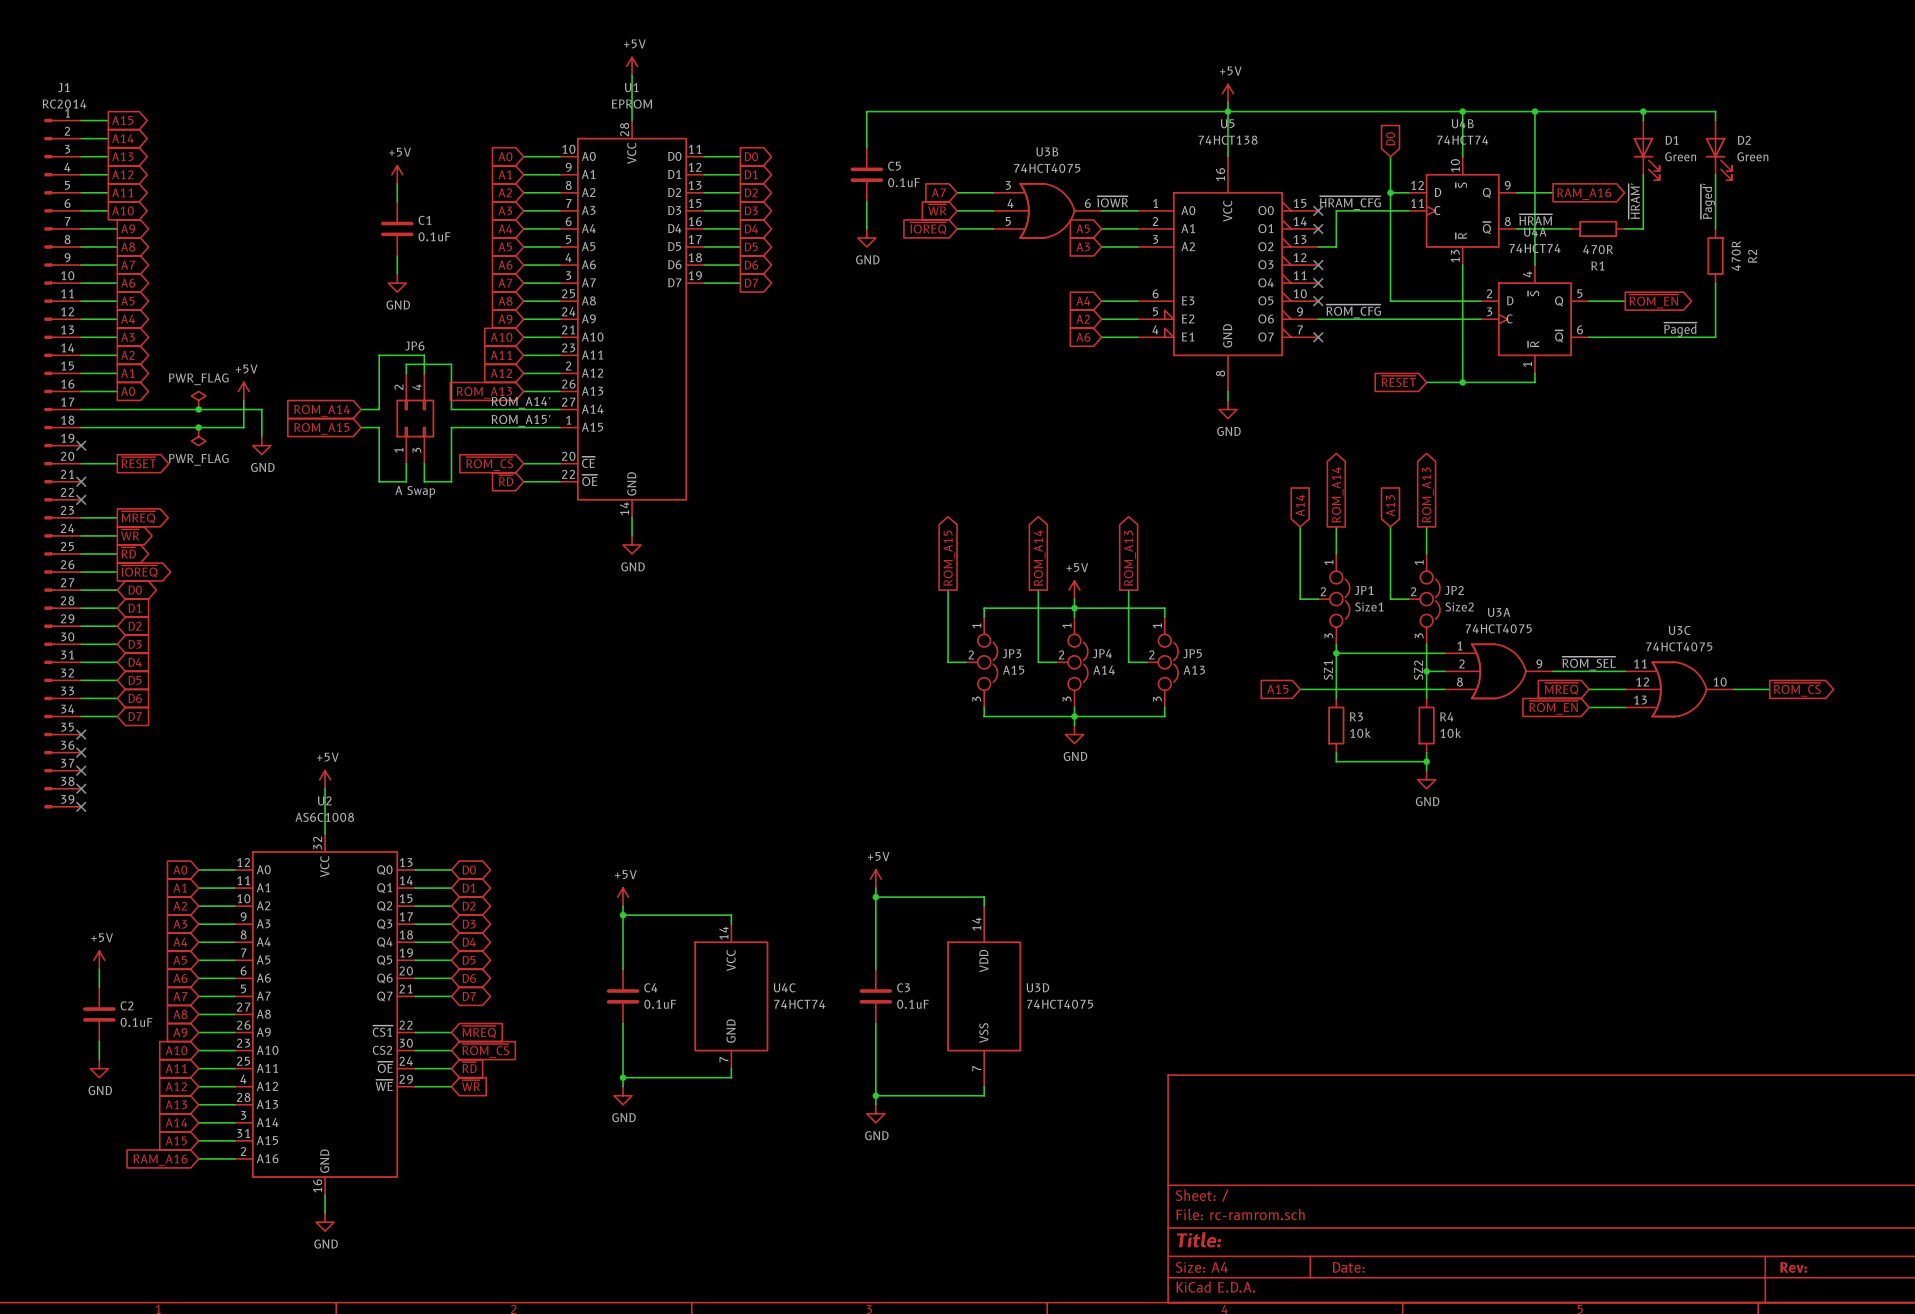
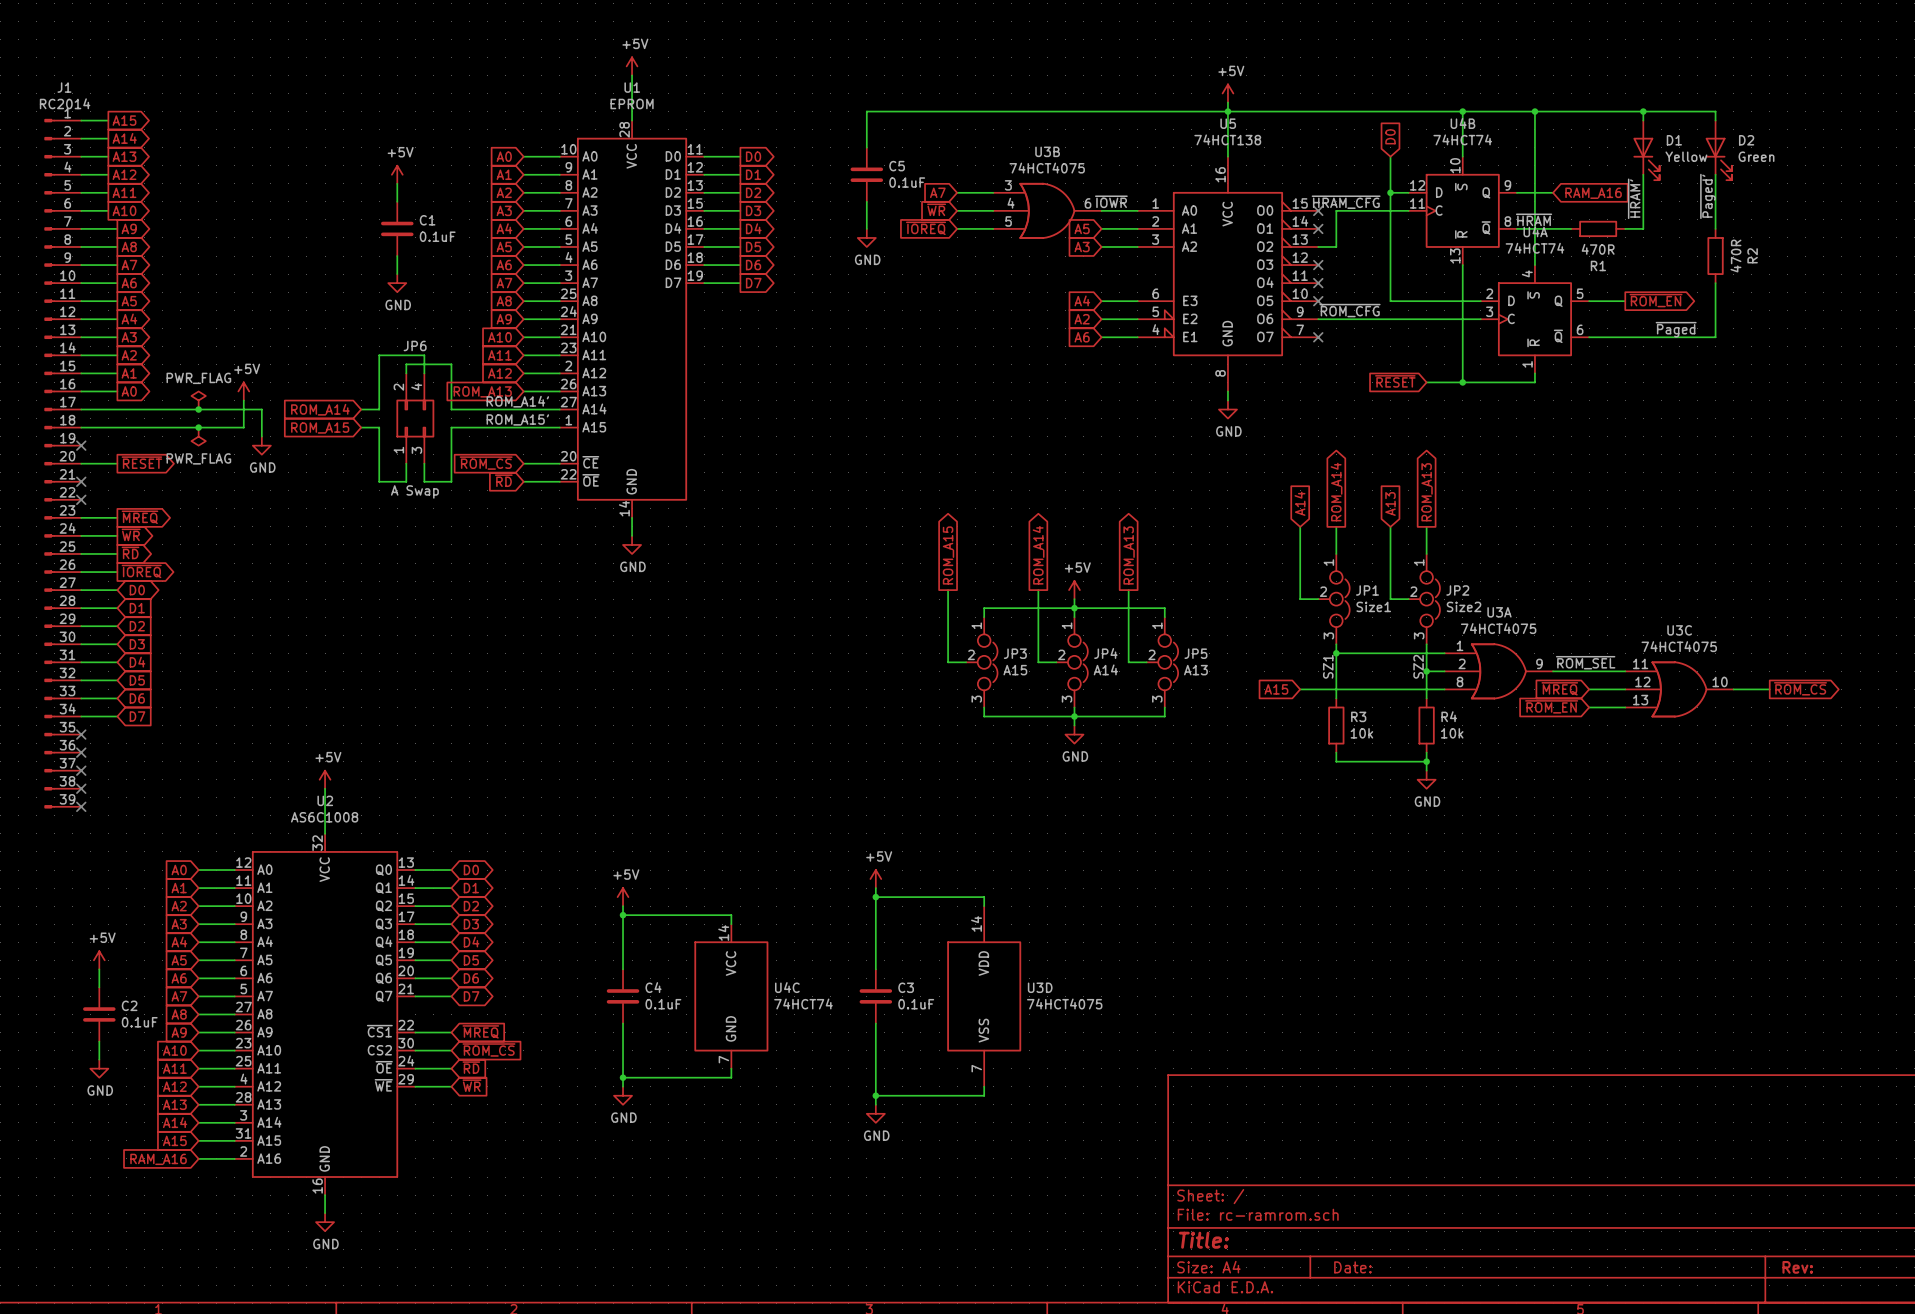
D1 value: Green (1680, 156) -> Yellow (1686, 156)
global label shape: output (1584, 194) -> input (1593, 193)

